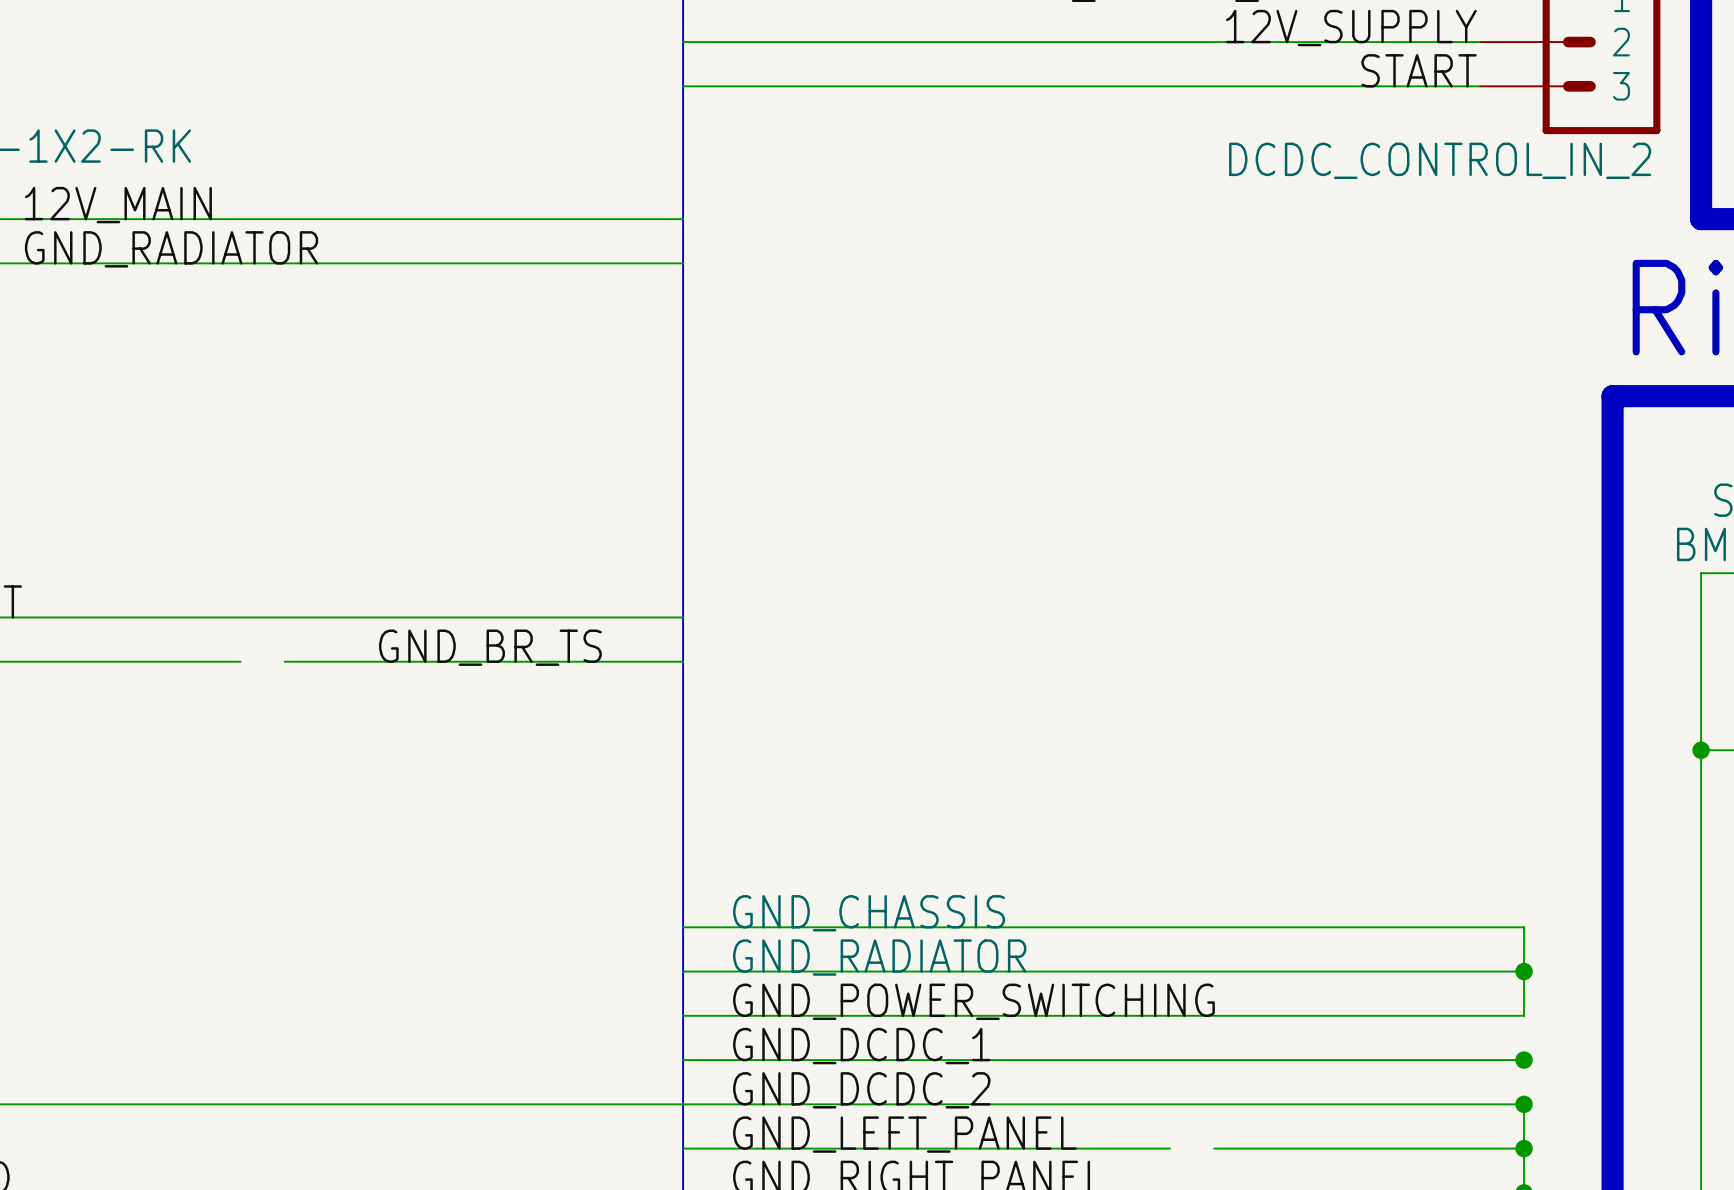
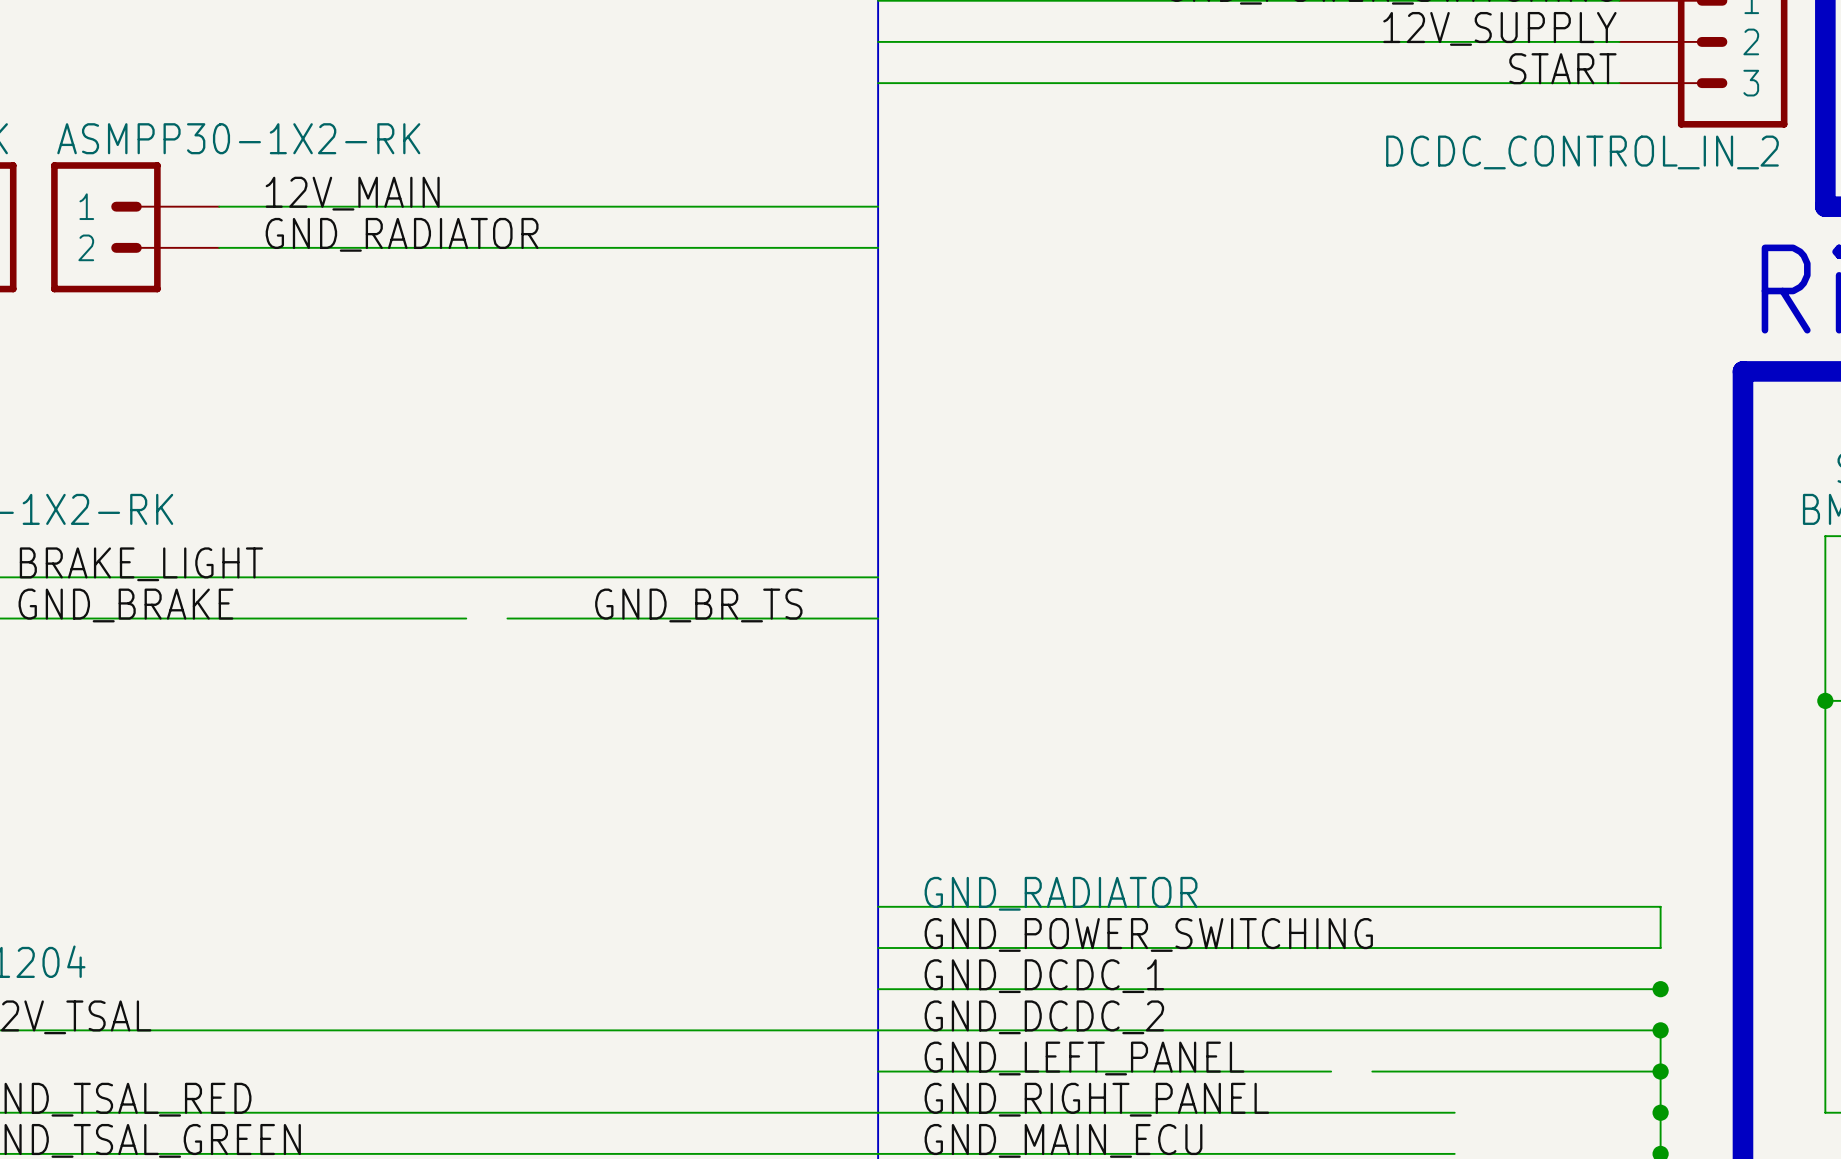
text: GND_CHASSIS (869, 913) -> none
wire: (683, 927) (1524, 927) (1524, 971) -> none
junction: (1524, 971) -> none

